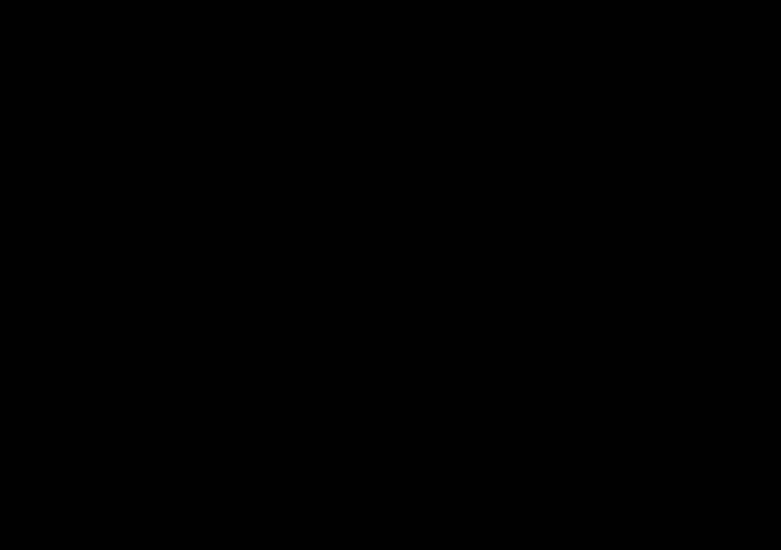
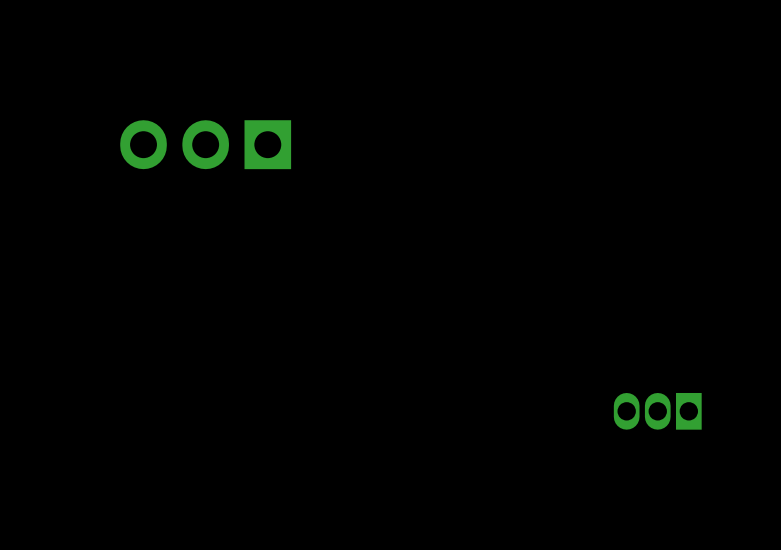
part: none -> (205, 144)
part: none -> (657, 411)

